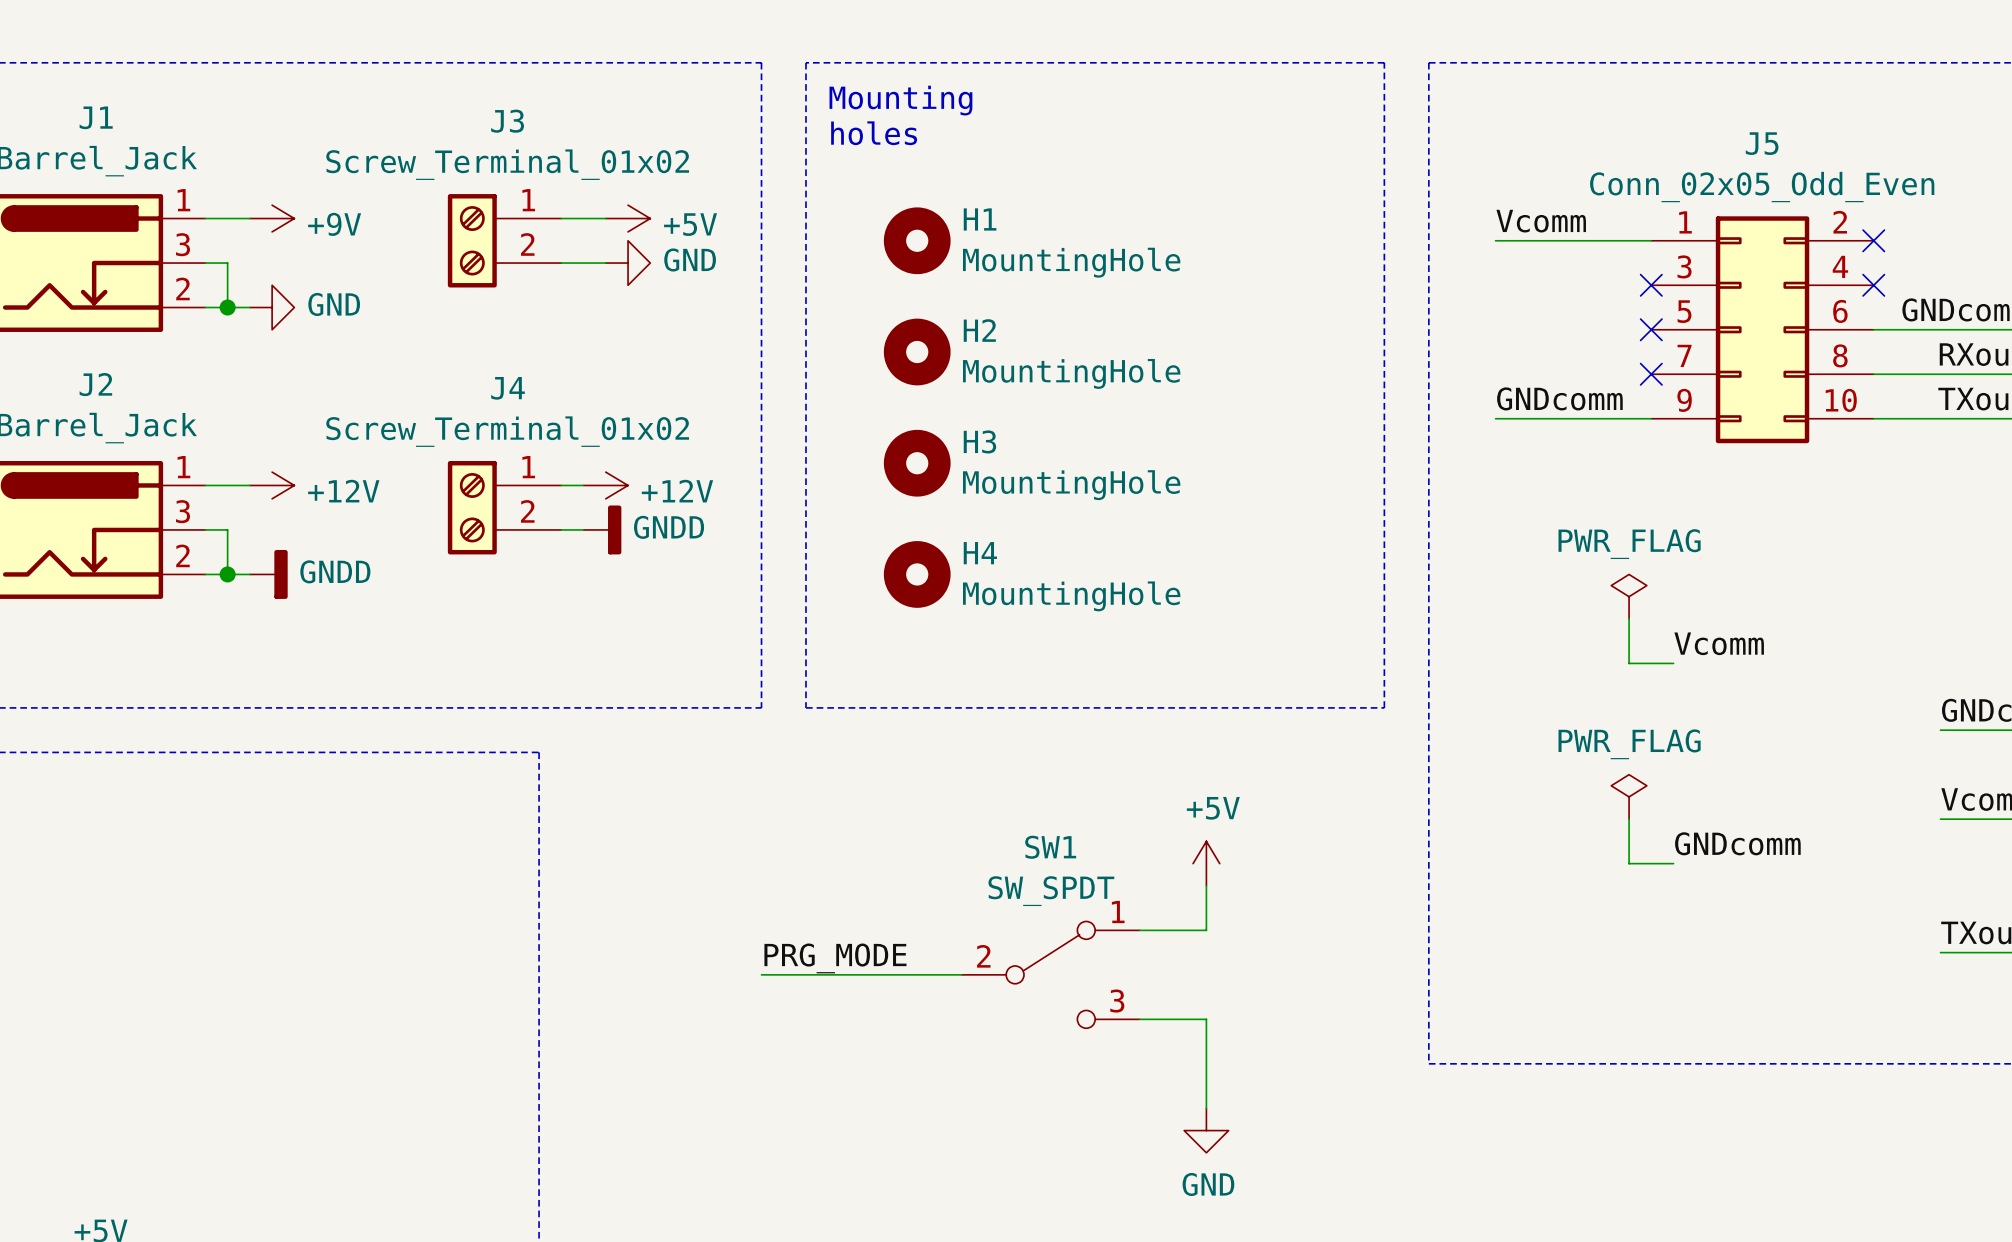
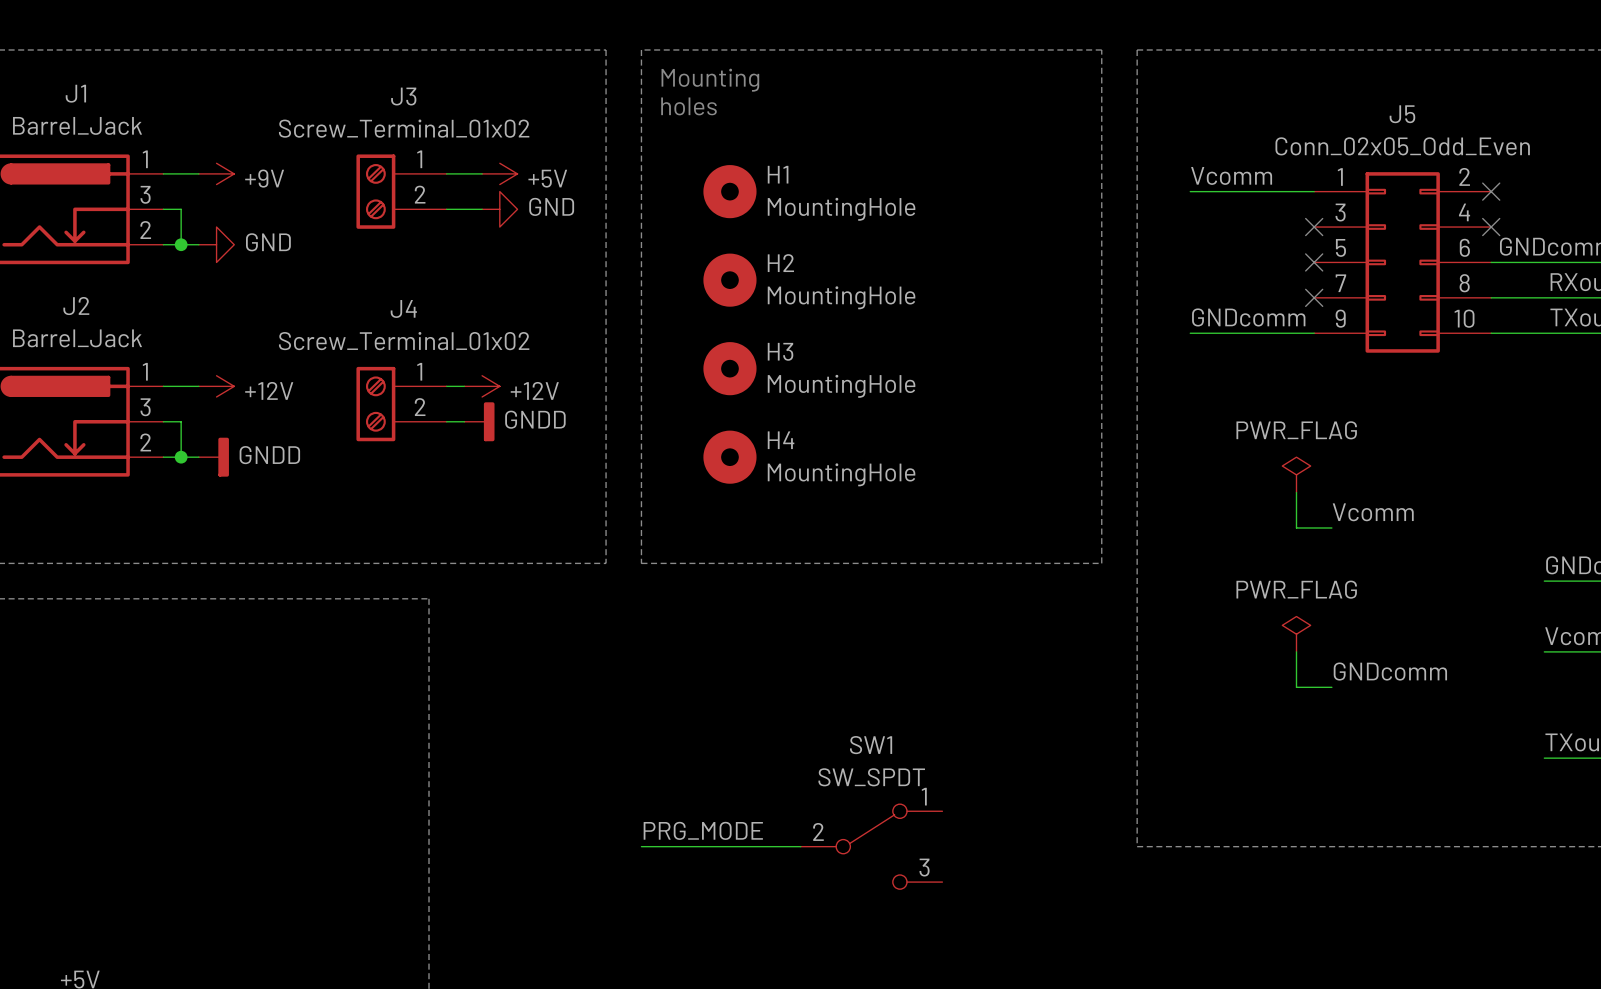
power symbol: +5V (1206, 863) -> none
wire: (1206, 885) (1206, 930) (1139, 930) -> none
label position: PRG_MODE (835, 958) -> PRG_MODE (703, 830)
wire: (761, 974) (961, 974) -> (641, 846) (800, 846)
SW1 position: (1050, 974) -> (871, 846)
wire: (1139, 1019) (1206, 1019) (1206, 1108) -> none
power symbol: GND (1206, 1130) -> none

